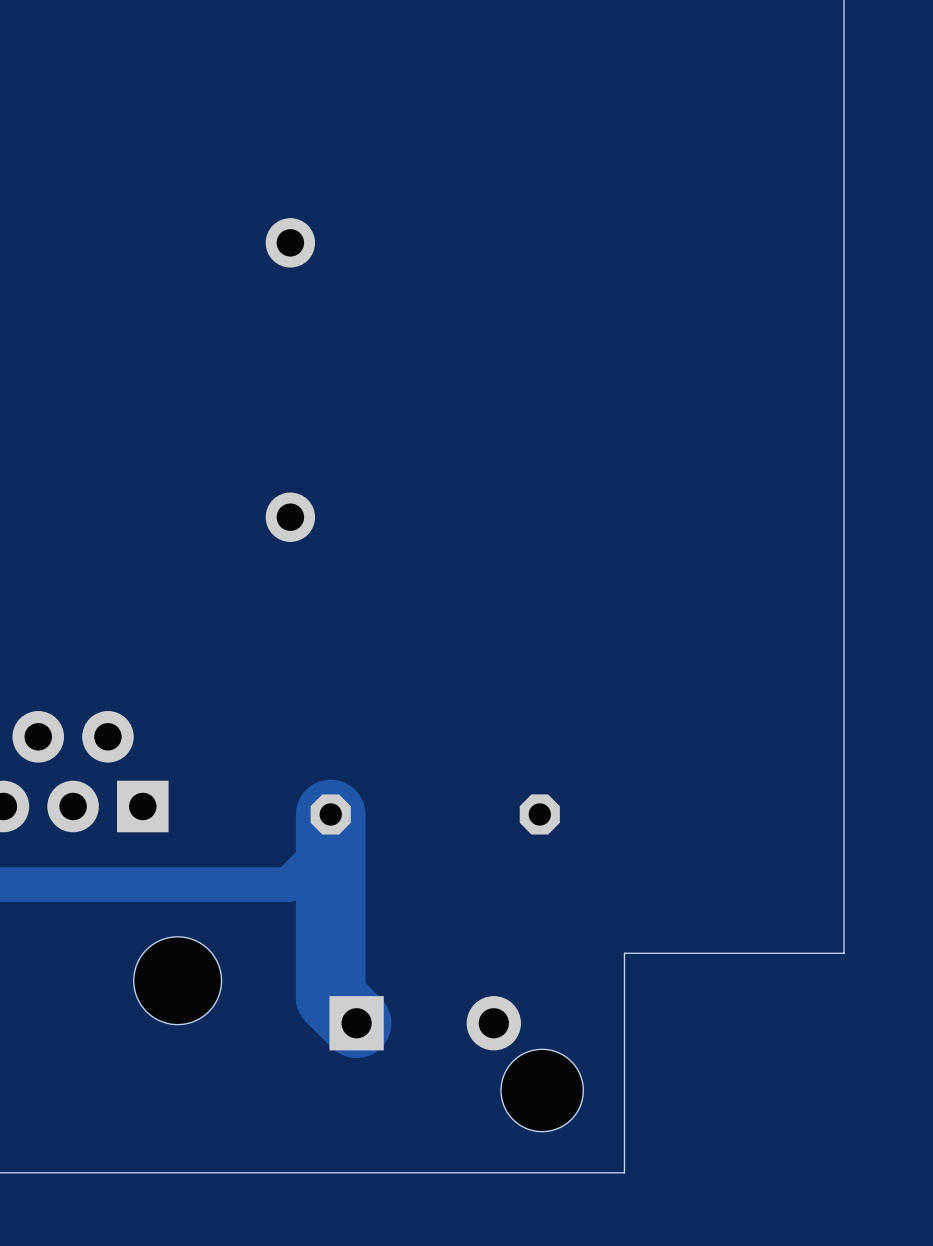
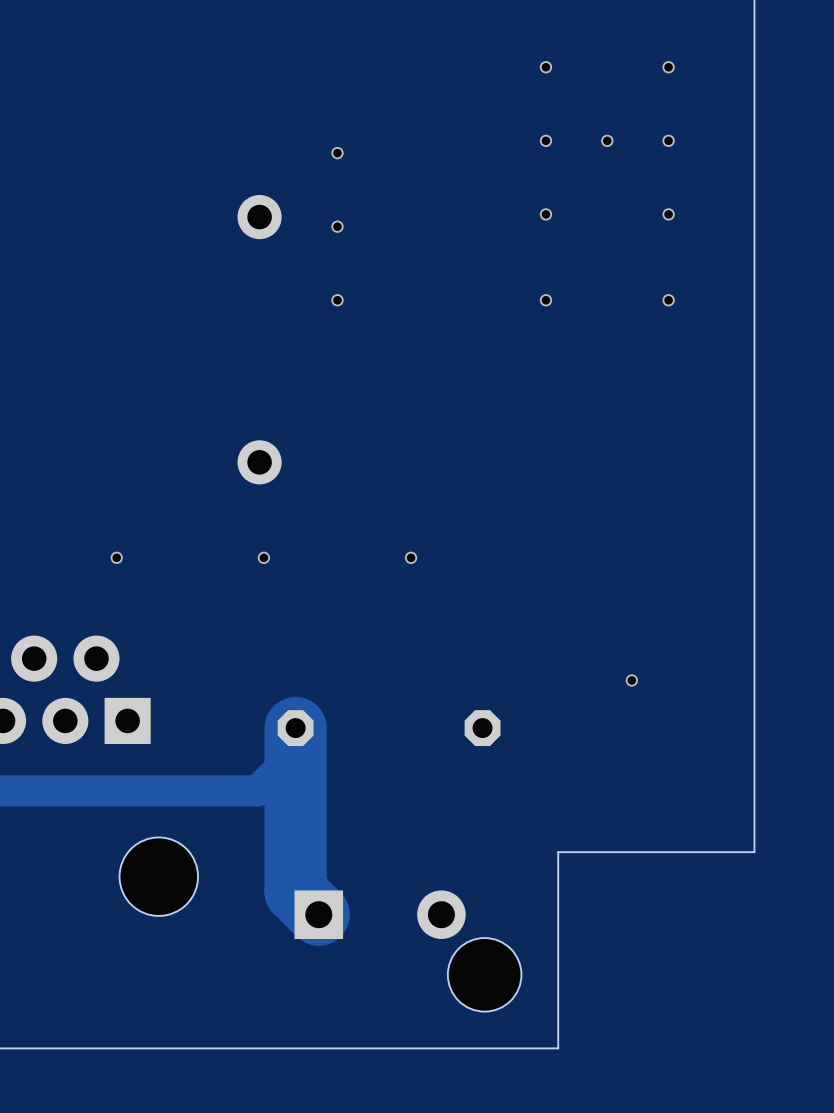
via: none -> (545, 67)
via: none -> (668, 67)
via: none -> (545, 140)
via: none -> (607, 140)
via: none -> (668, 140)
via: none -> (337, 153)
via: none -> (545, 214)
via: none -> (668, 214)
via: none -> (337, 226)
via: none -> (337, 300)
via: none -> (545, 300)
via: none -> (668, 300)
via: none -> (116, 557)
via: none -> (263, 557)
via: none -> (411, 557)
via: none -> (631, 680)

